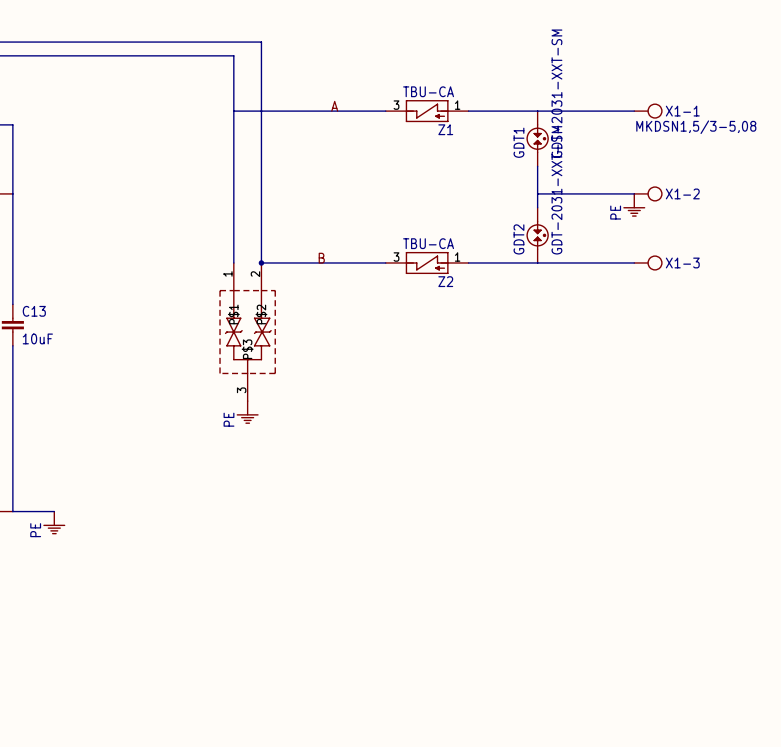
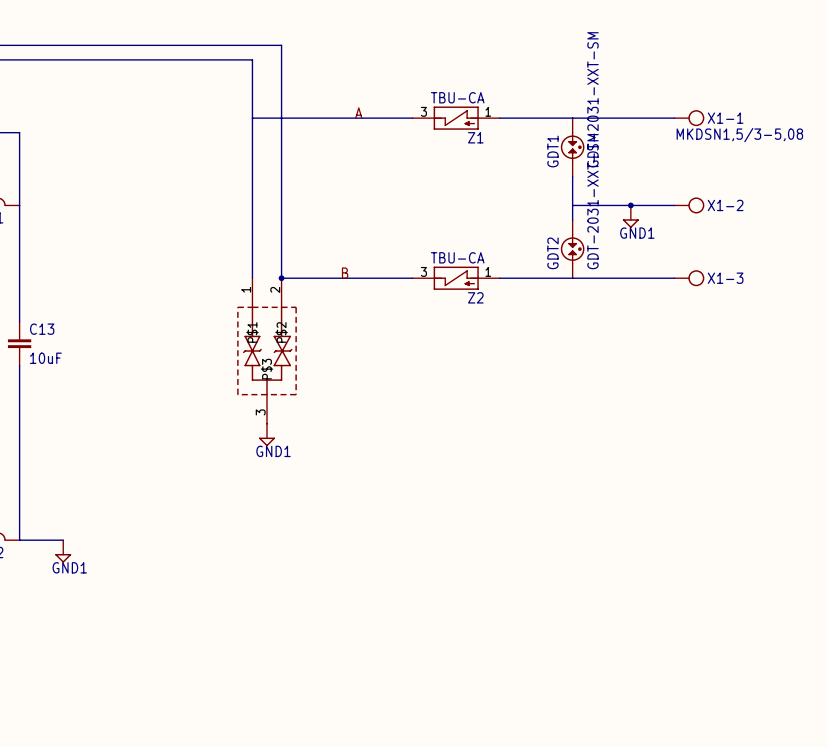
junction: none -> (630, 205)
power symbol: none -> GND1 (630, 216)
power symbol: PE (634, 205) -> none
power symbol: PE (247, 412) -> GND1 (267, 435)
power symbol: PE (54, 522) -> GND1 (63, 551)

